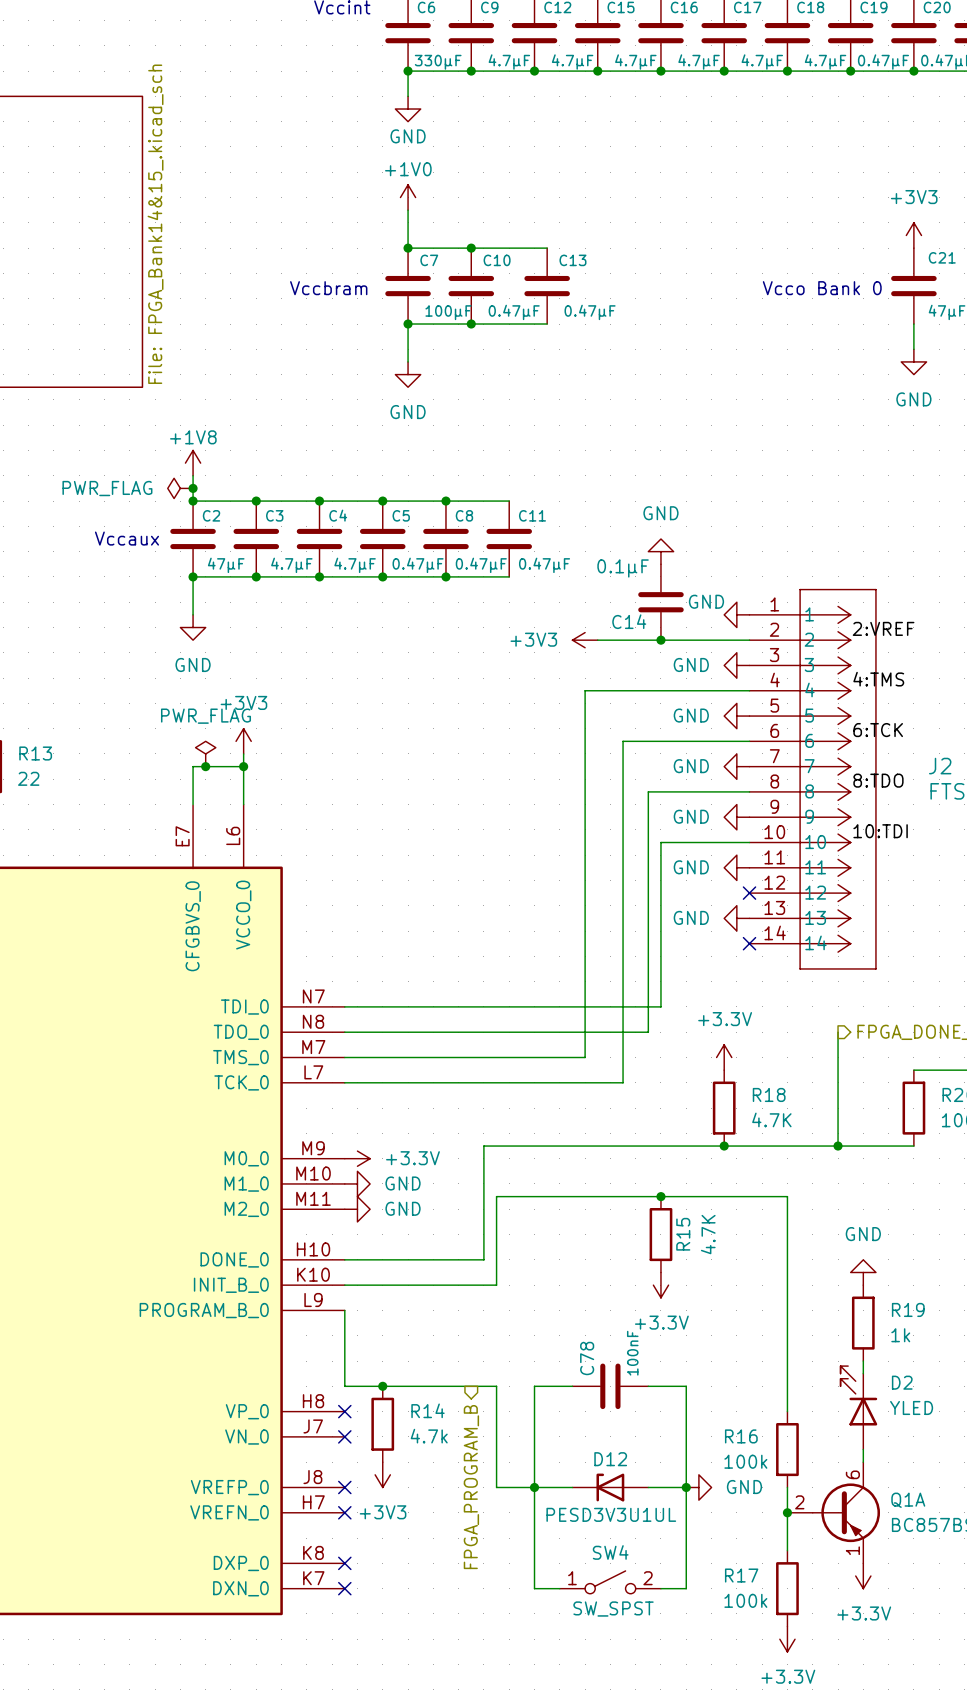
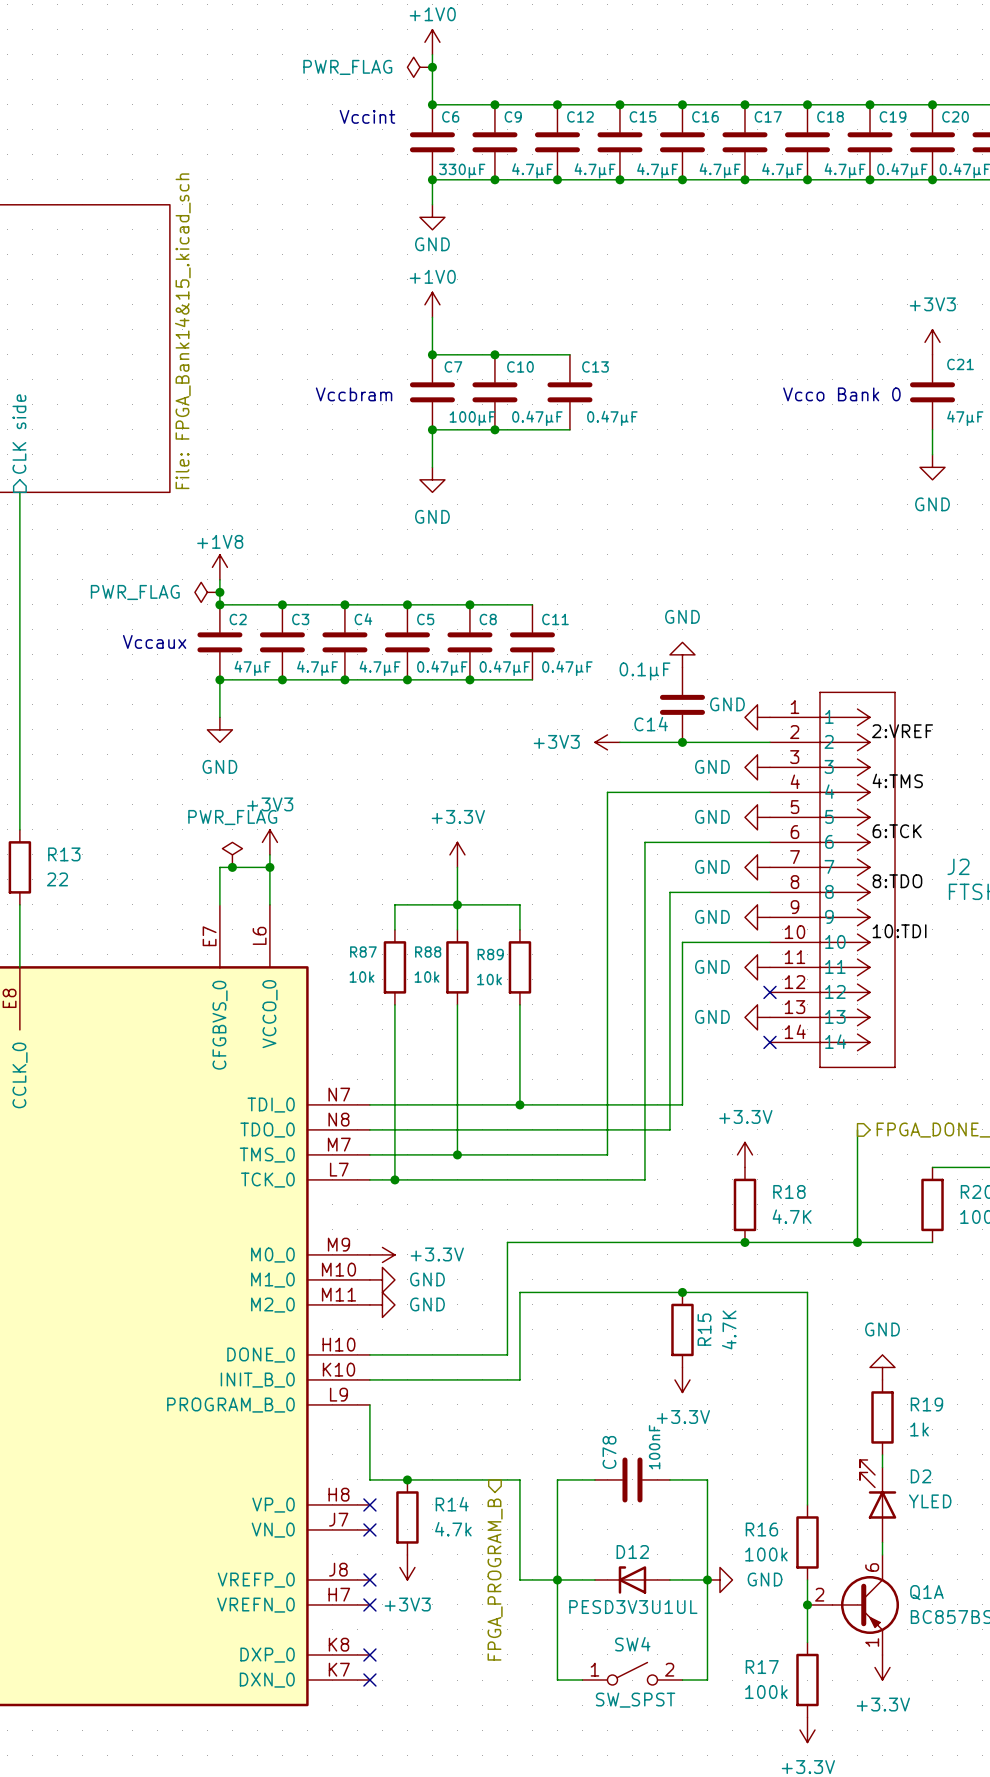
power symbol: none -> +3.3V (457, 854)
wire: none -> (457, 867) (457, 929)
junction: none -> (457, 904)
wire: none -> (394, 929) (394, 904) (519, 904) (519, 929)
R87: none -> 10k (394, 967)
R88: none -> 10k (457, 967)
R89: none -> 10k (519, 967)
wire: none -> (394, 1004) (394, 1179)
wire: none -> (457, 1004) (457, 1154)
wire: none -> (519, 1004) (519, 1104)
junction: none -> (519, 1104)
junction: none -> (457, 1154)
junction: none -> (394, 1179)

